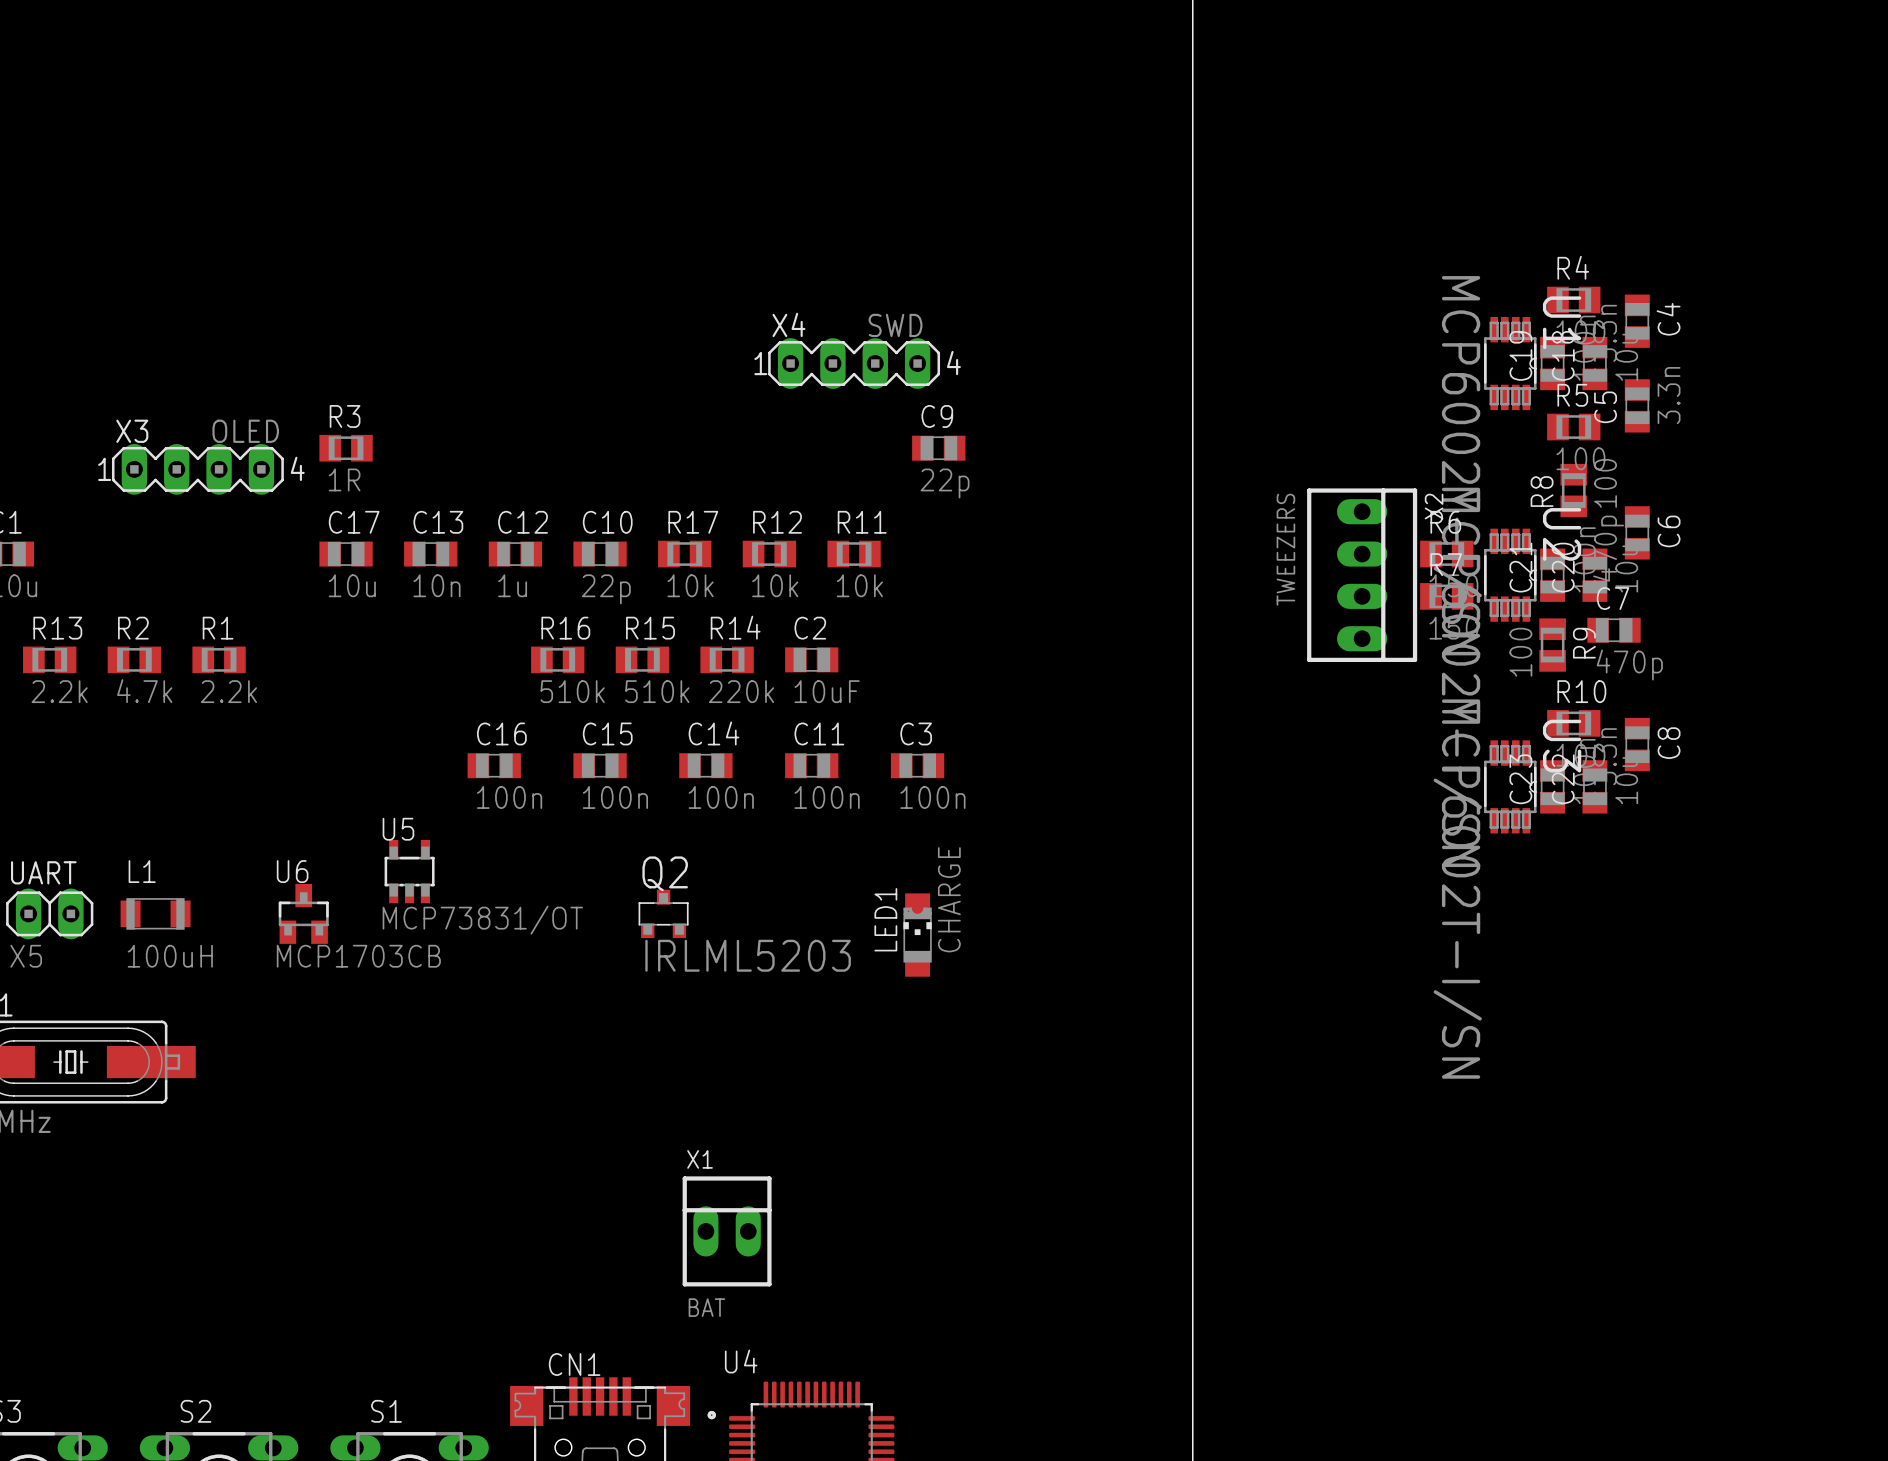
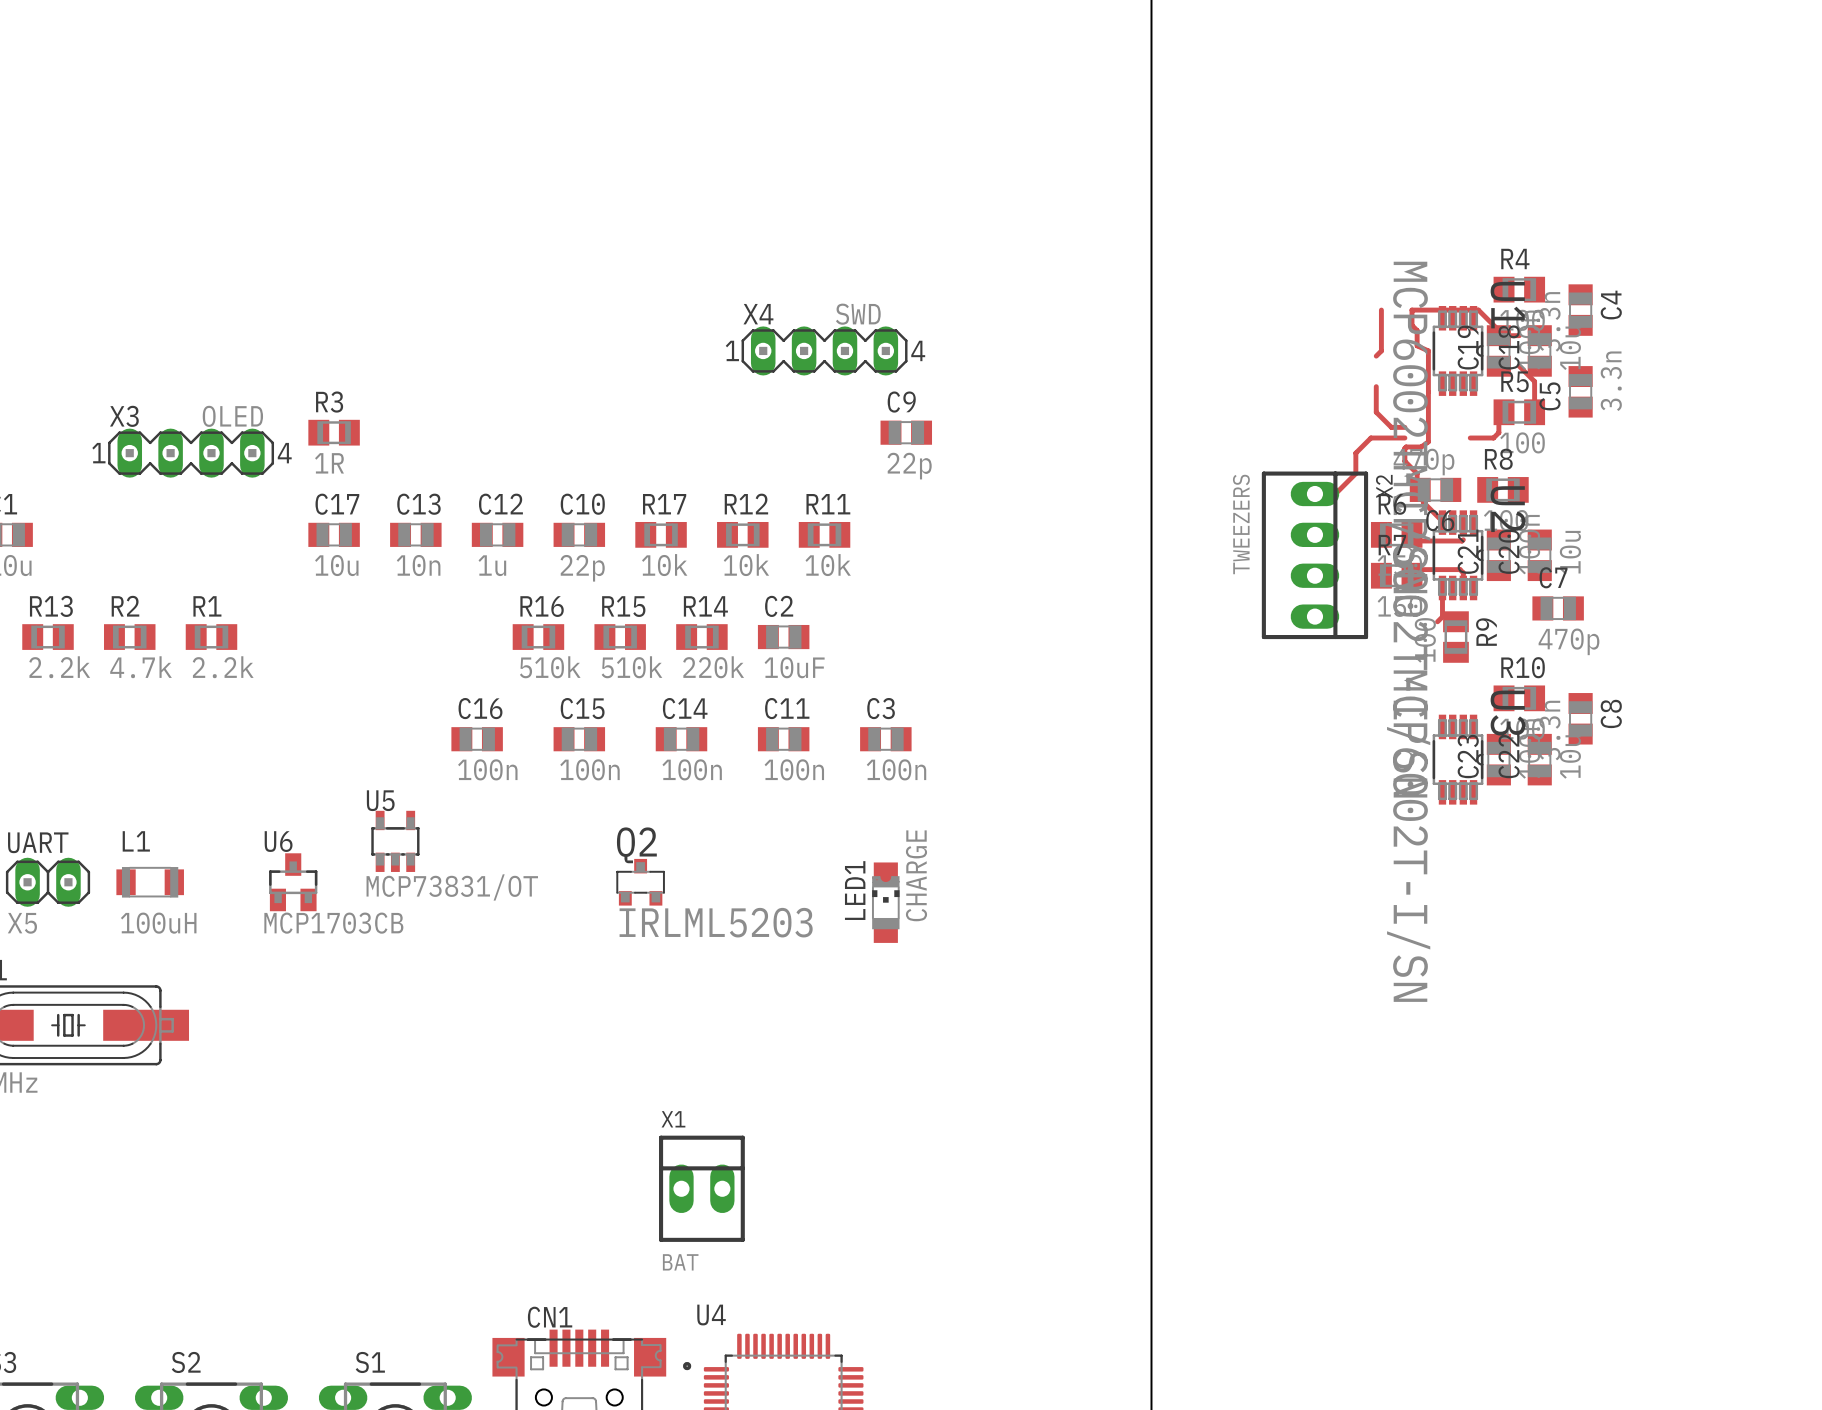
track: none -> (1381, 310) (1381, 350) (1376, 356)
track: none -> (1519, 335) (1504, 335) (1478, 310) (1411, 310) (1411, 325) (1417, 330) (1417, 345) (1428, 350) (1428, 441) (1421, 446) (1406, 446) (1404, 461) (1417, 473) (1417, 486) (1423, 492) (1423, 502) (1442, 522)
track: none -> (1519, 366) (1534, 381) (1534, 412)
track: none -> (1376, 386) (1376, 412) (1391, 427) (1404, 427)
track: none -> (1498, 417) (1498, 432) (1493, 438) (1470, 438)
track: none -> (1404, 438) (1370, 438) (1355, 453) (1355, 473) (1335, 493) (1314, 493)
R8 rotation: 0° (1573, 490) -> 90° clockwise (1502, 489)
C6 rotation: 0° (1637, 532) -> 90° clockwise (1435, 489)
C6 position: (1637, 532) -> (1435, 489)
track: none -> (1411, 534) (1418, 540) (1463, 539)
track: none -> (1411, 575) (1418, 569) (1460, 569) (1463, 572) (1463, 587)
track: none -> (1442, 587) (1442, 616) (1437, 621)
R9 position: (1552, 645) -> (1455, 637)

